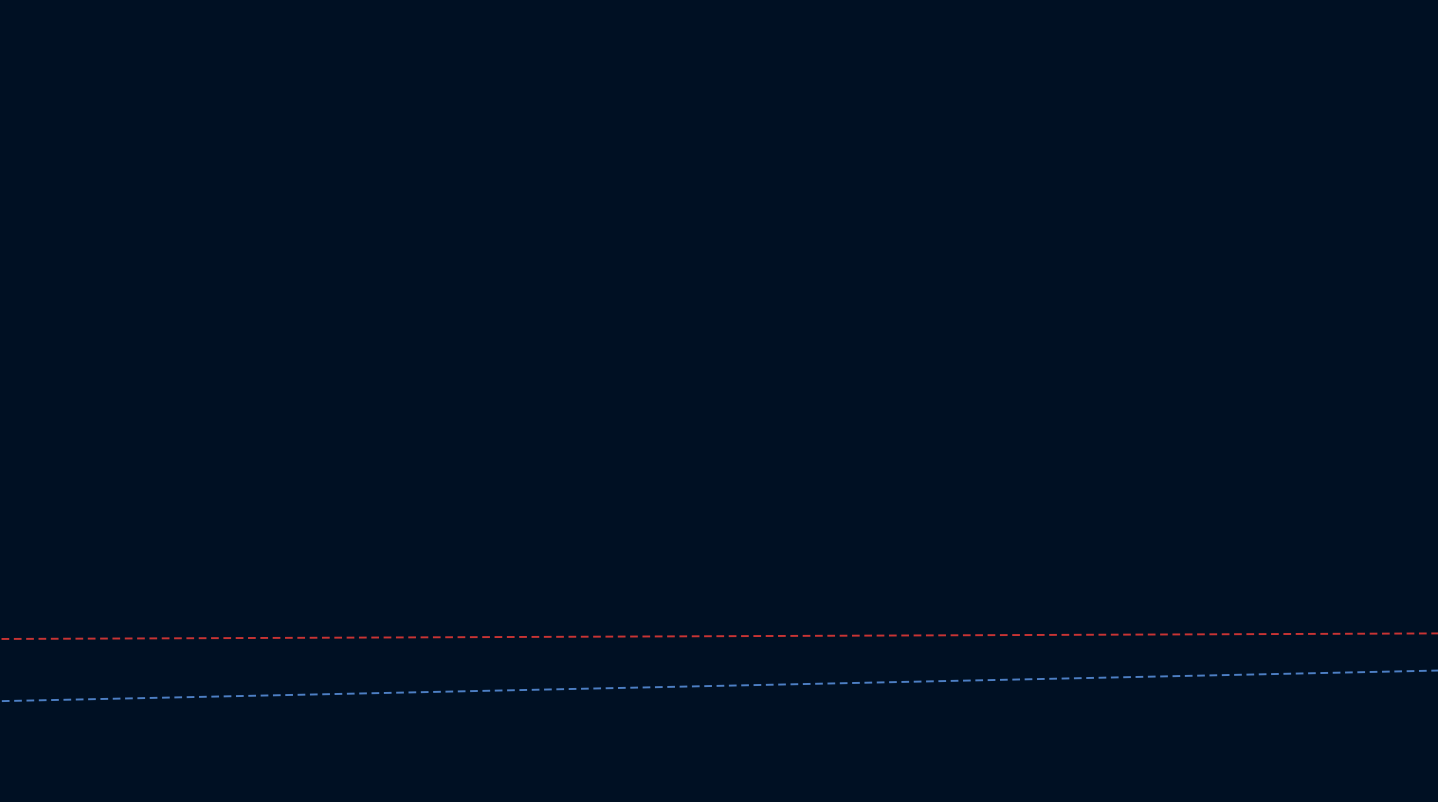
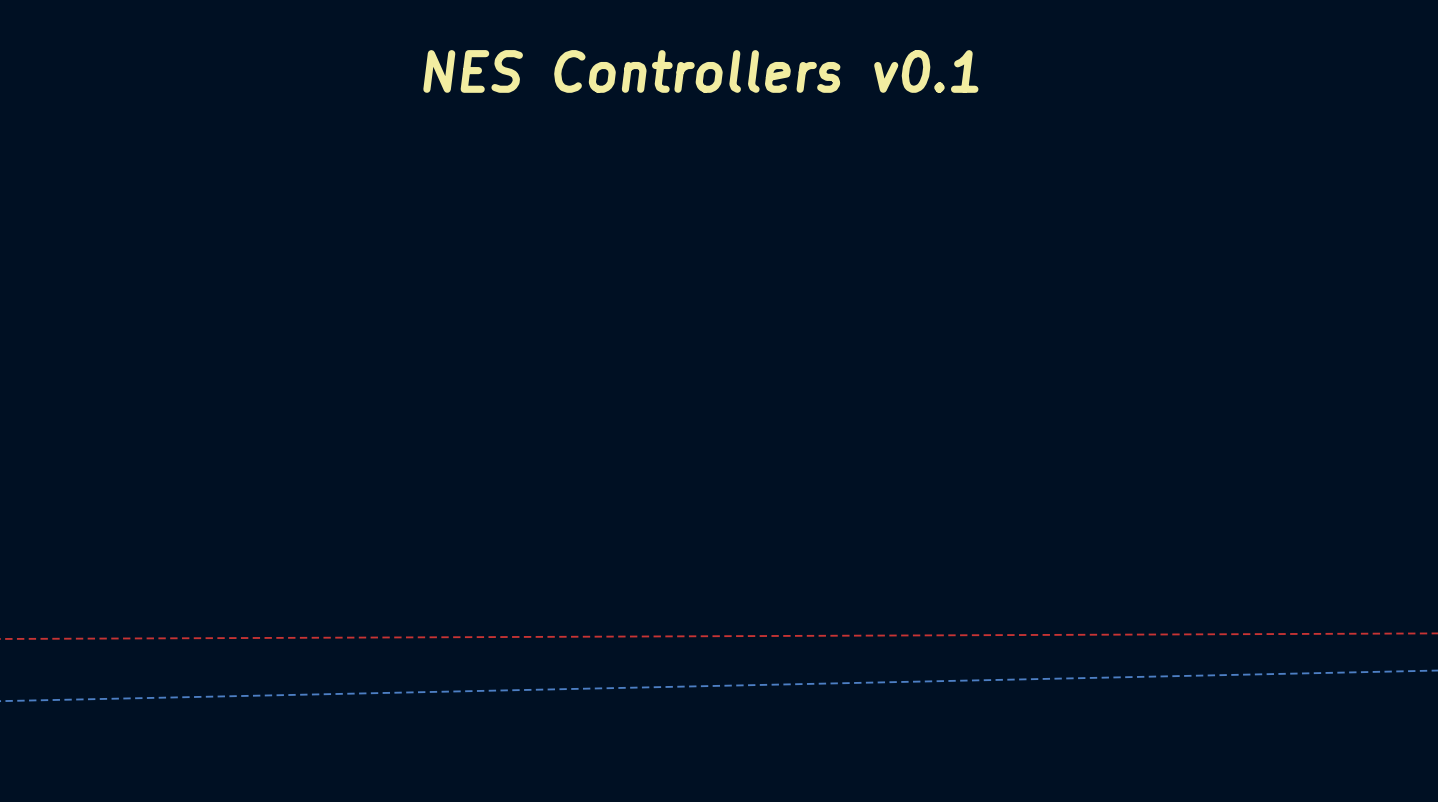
text: none -> NES Controllers v0.1 (700, 71)

